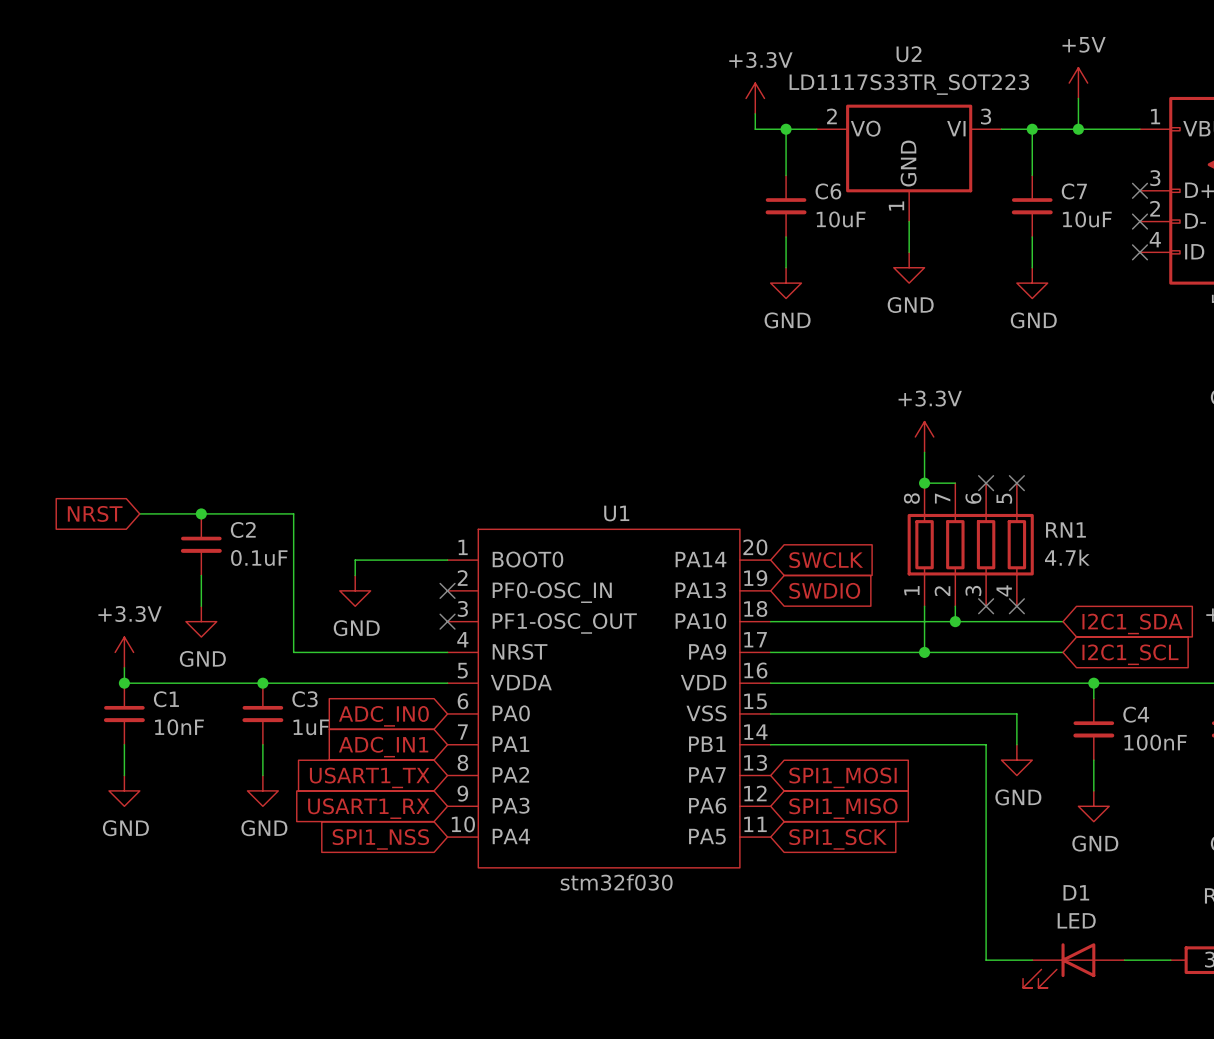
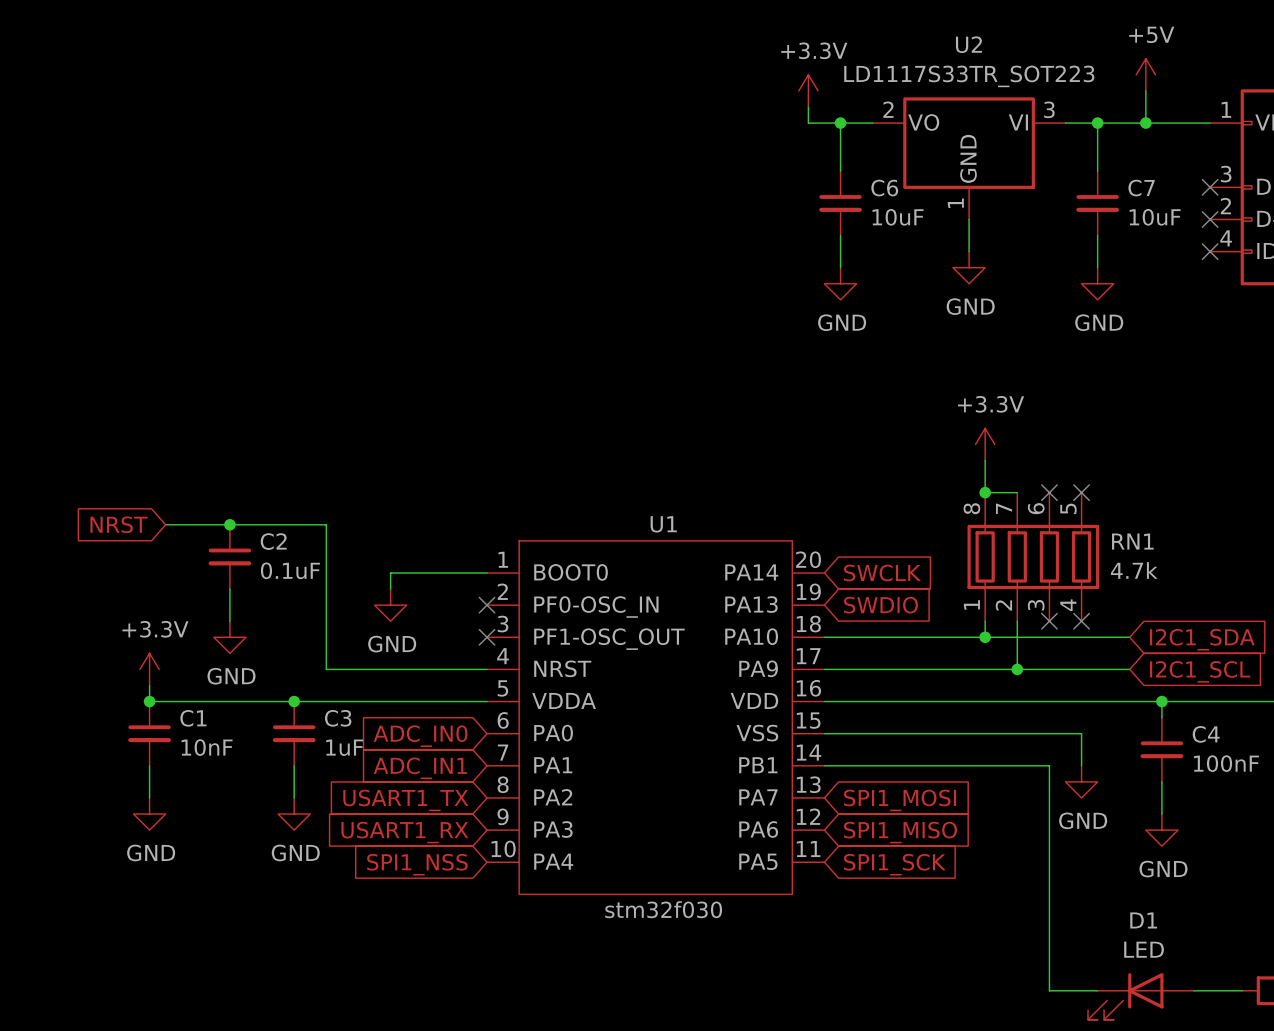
wire: (924, 621) (924, 652) -> (1017, 637) (1017, 669)
junction: none -> (985, 637)
junction: (955, 621) -> none
junction: (924, 652) -> none
junction: none -> (1017, 669)

